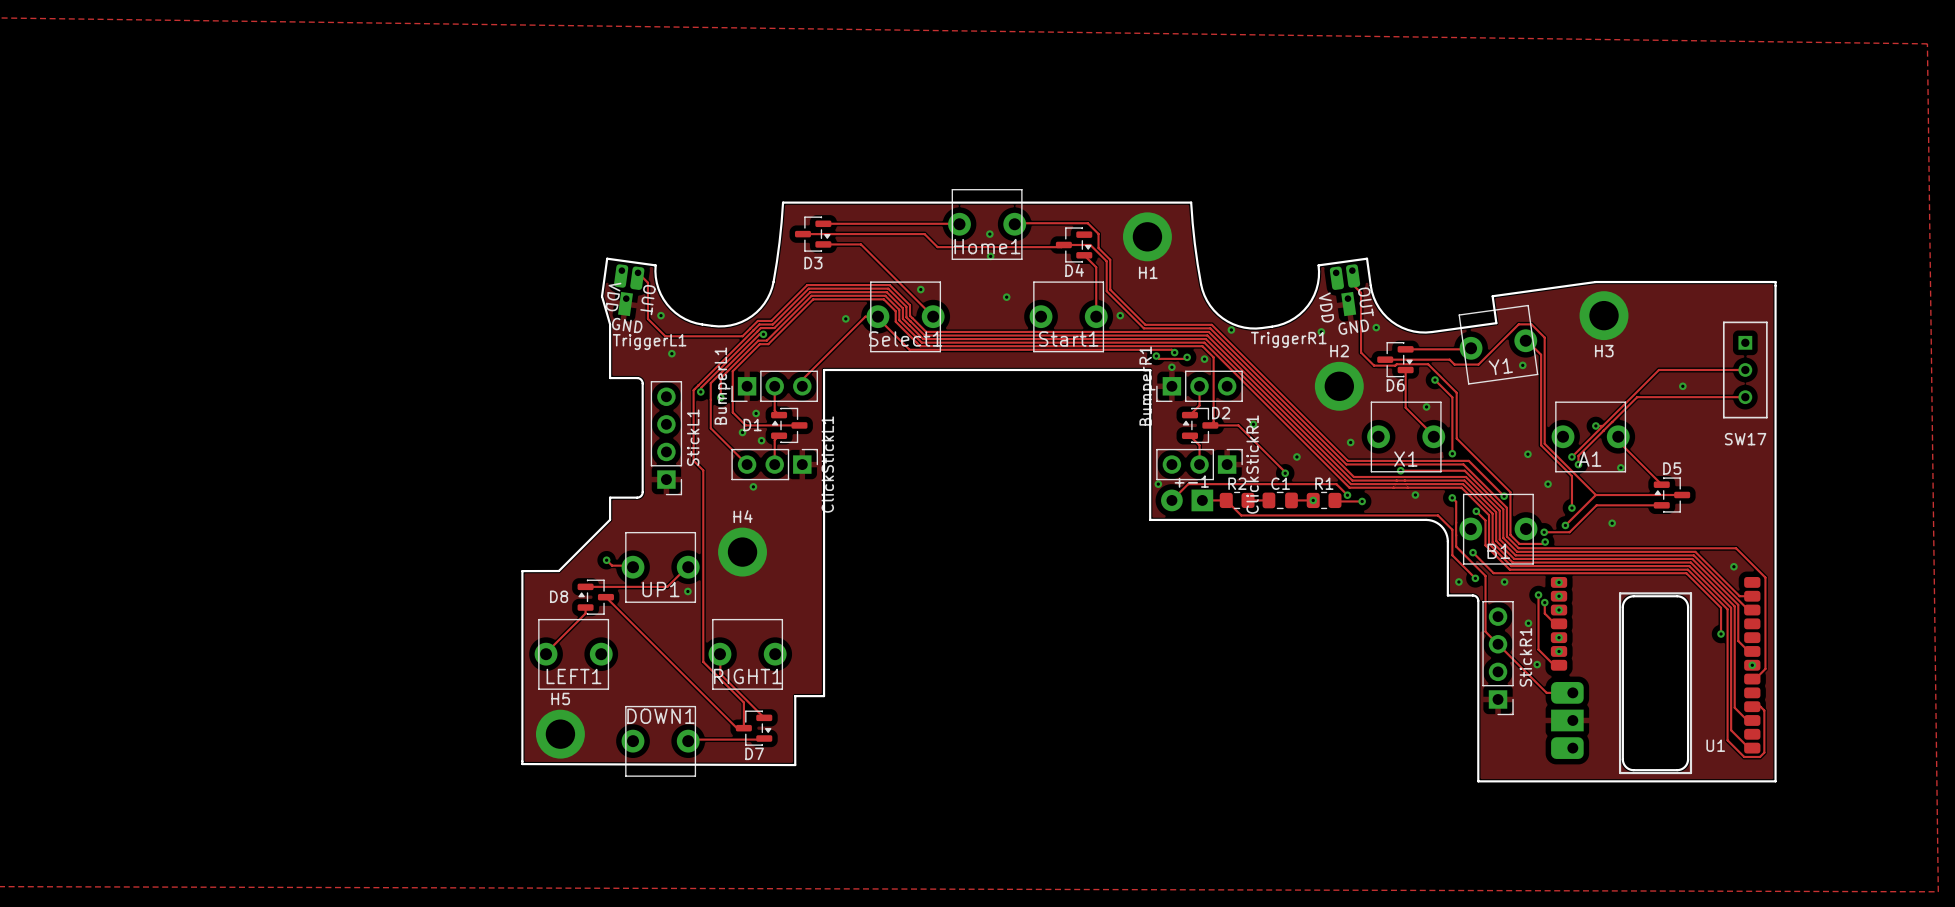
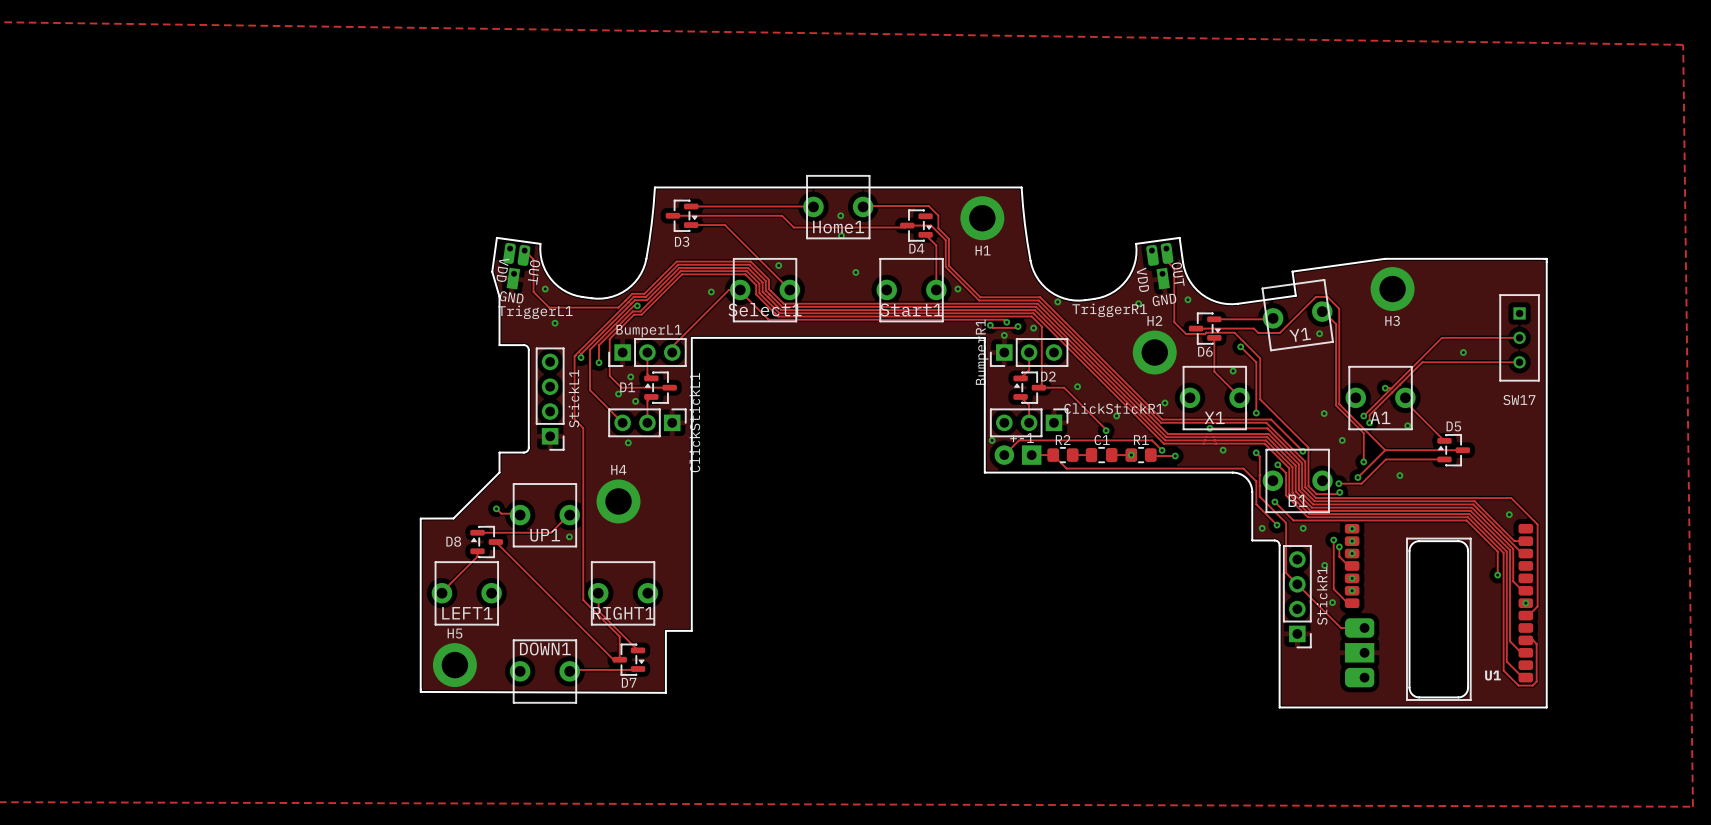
BumperL1 name rotation: 0° (722, 386) -> 90° clockwise (649, 331)
ClickStickR1 name rotation: 0° (1252, 464) -> 90° clockwise (1113, 408)

